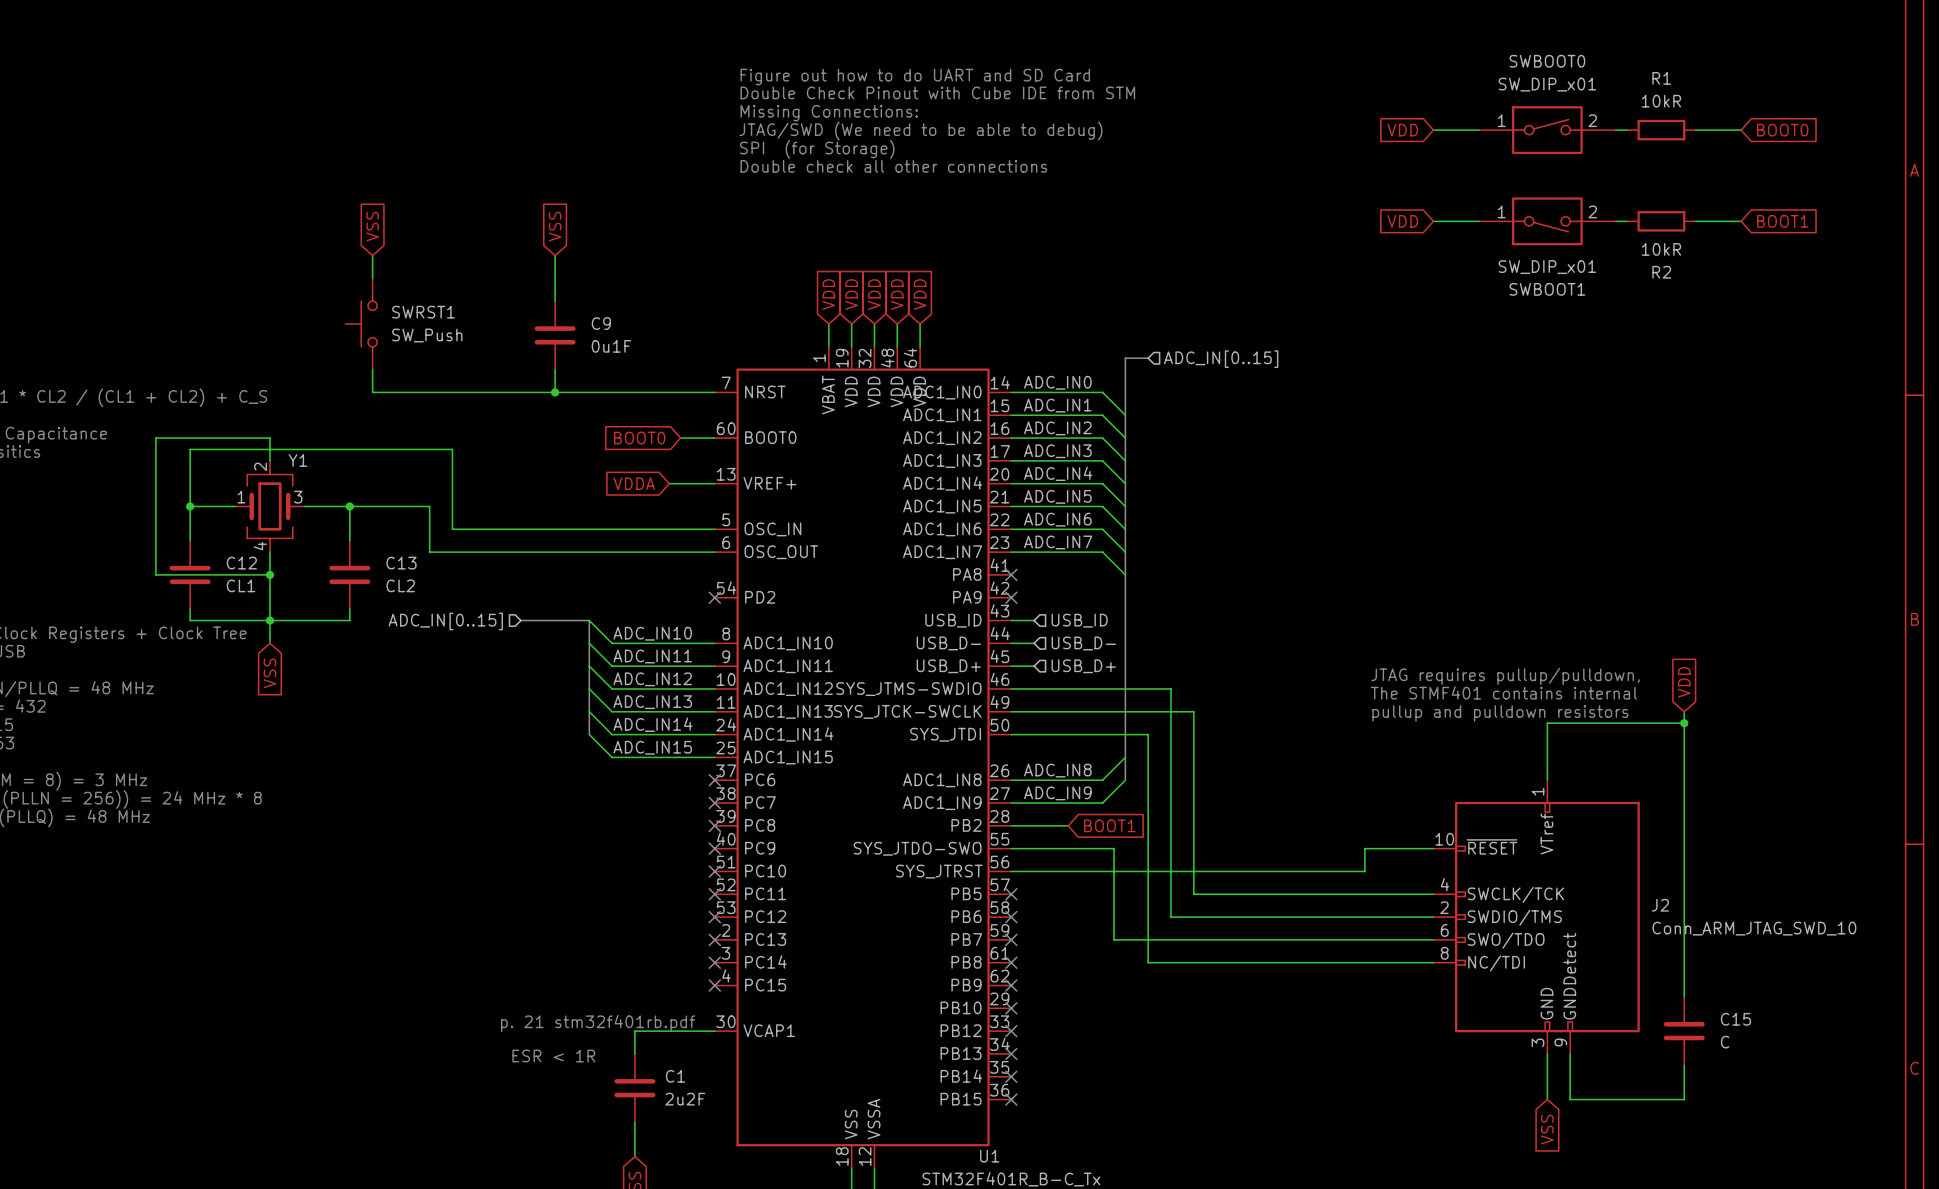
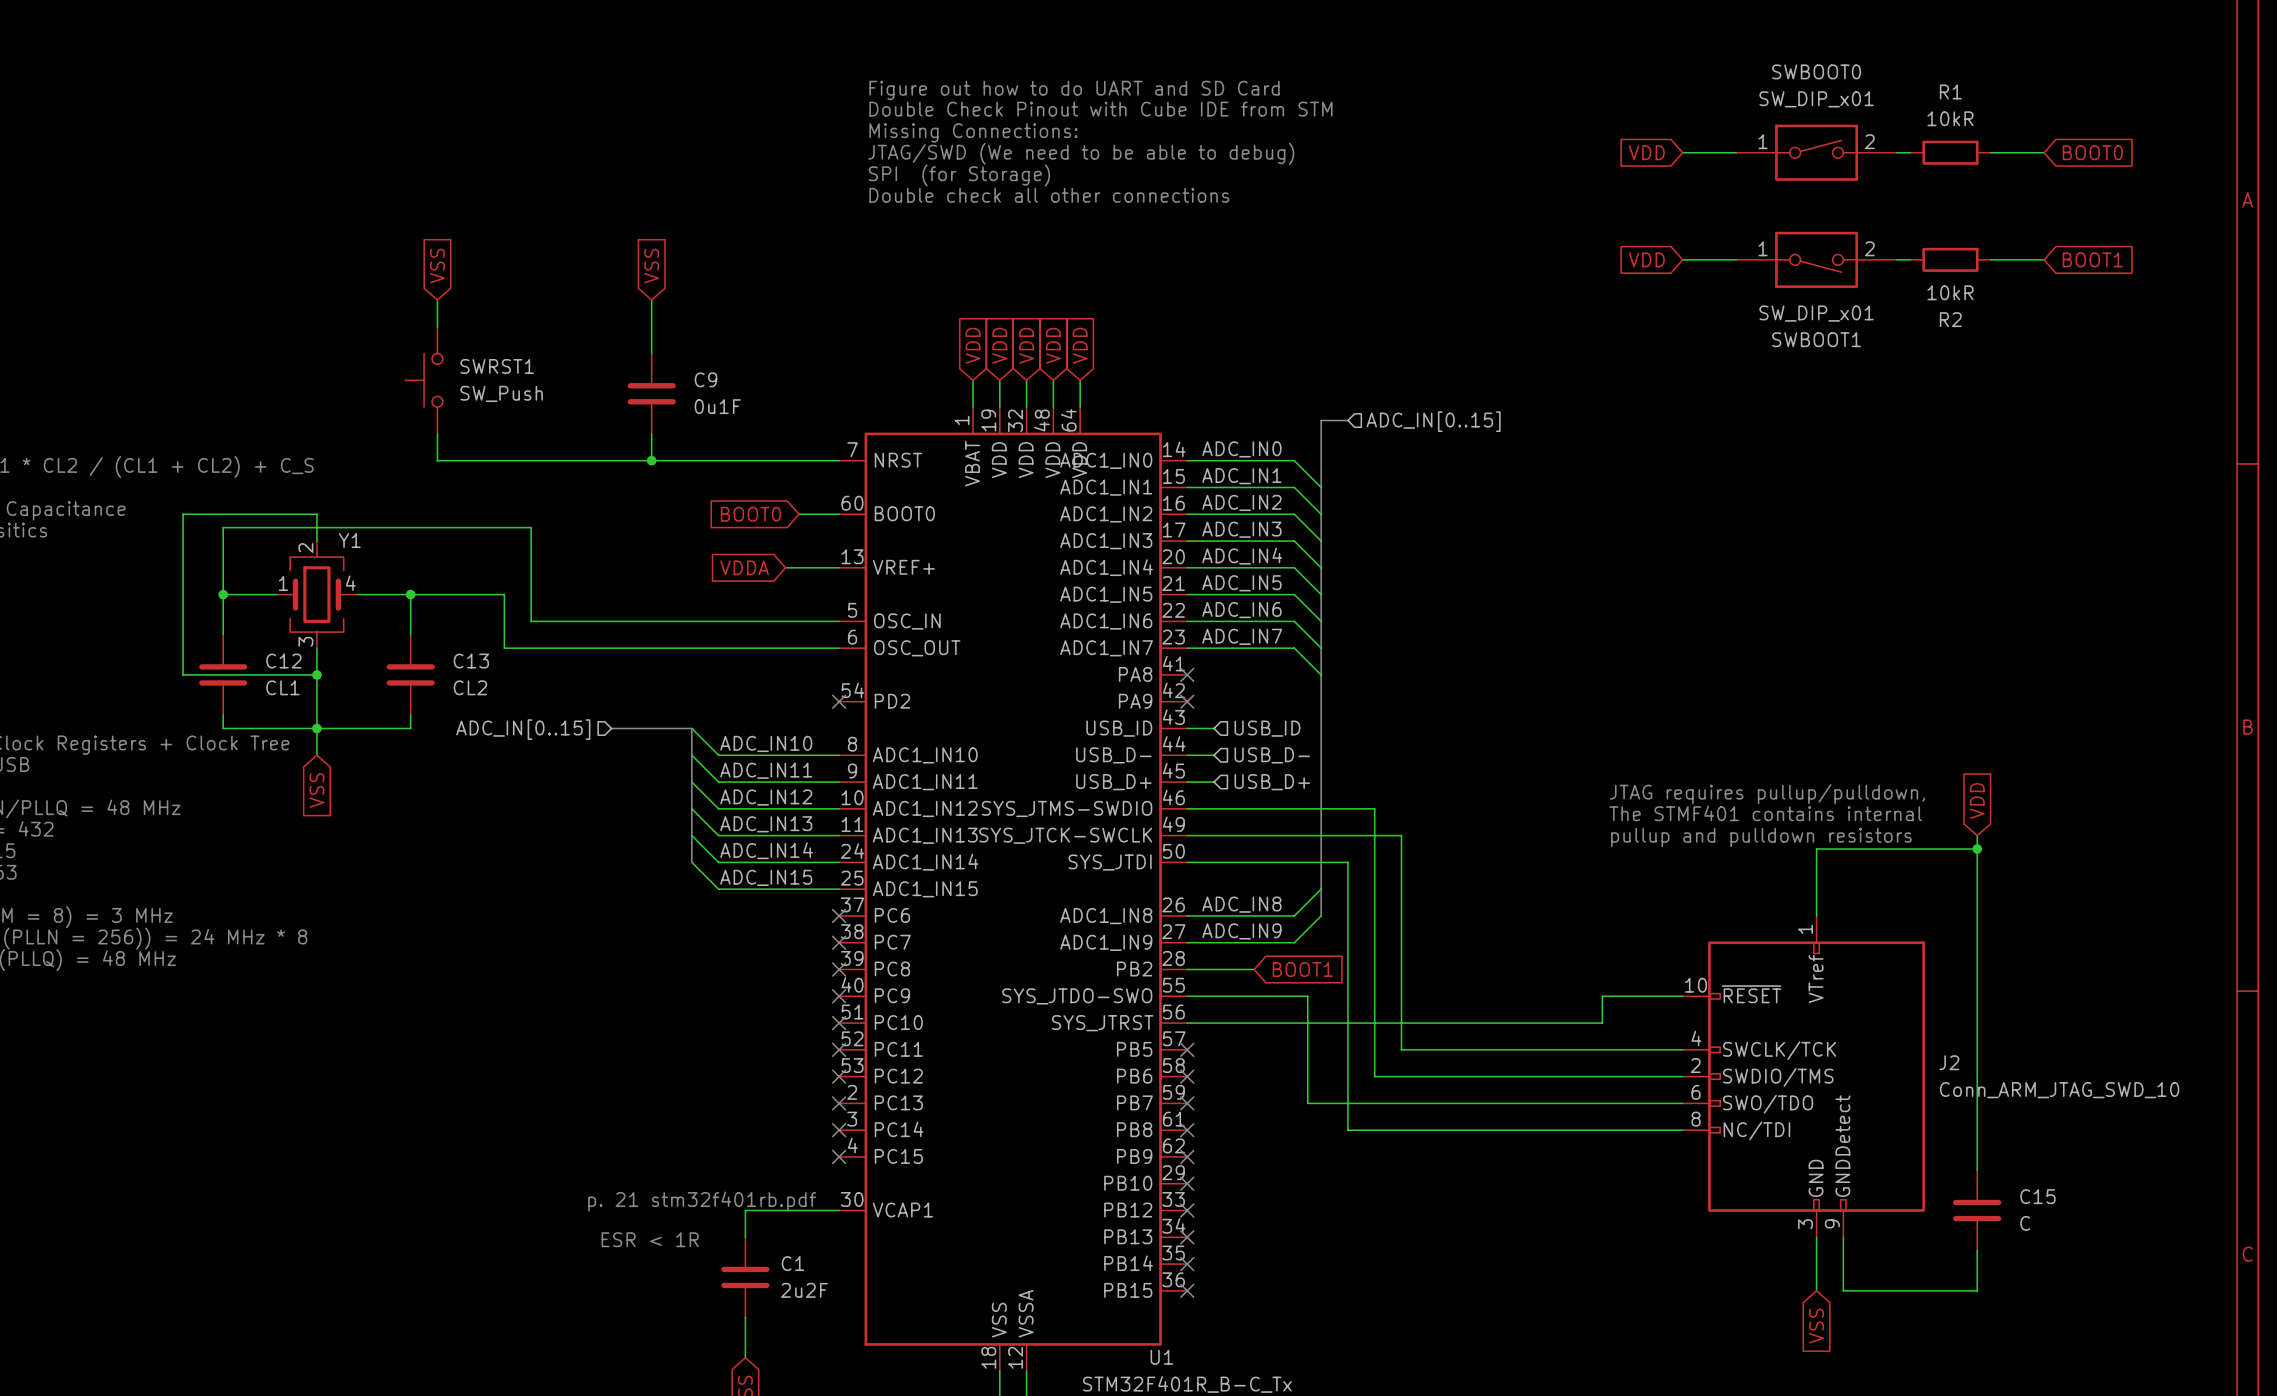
Y1 pin number: 3 (298, 497) -> 4 (350, 583)
Y1 pin number: 4 (260, 546) -> 3 (305, 641)

